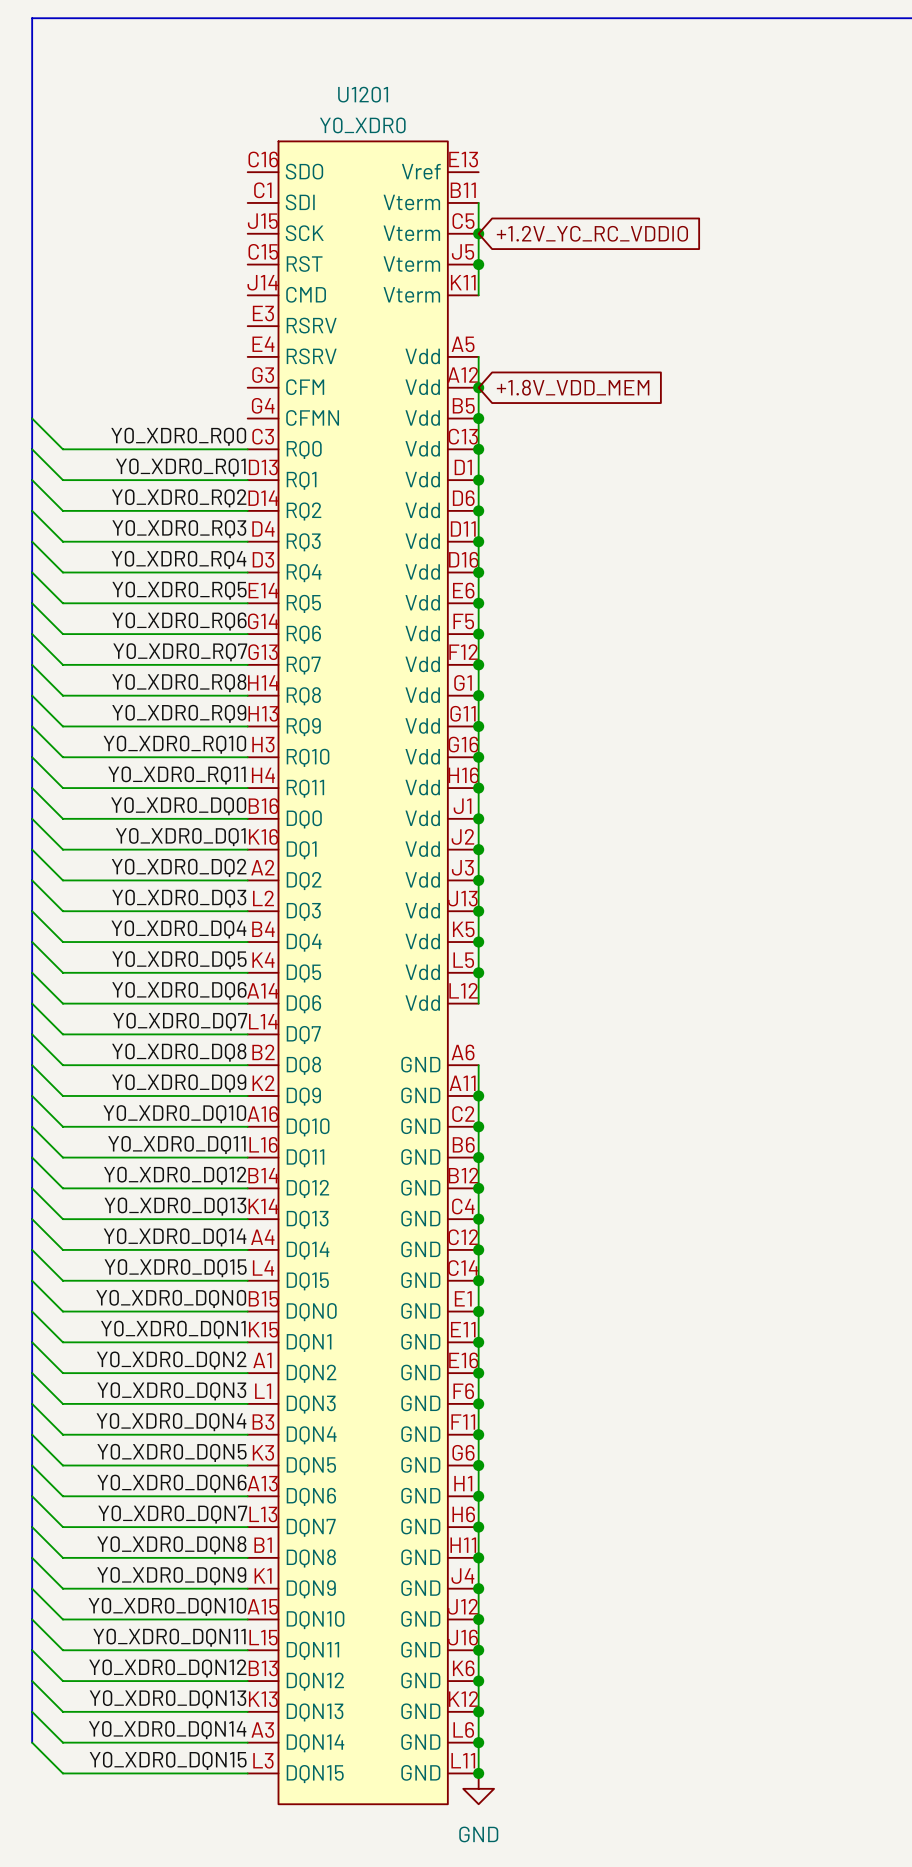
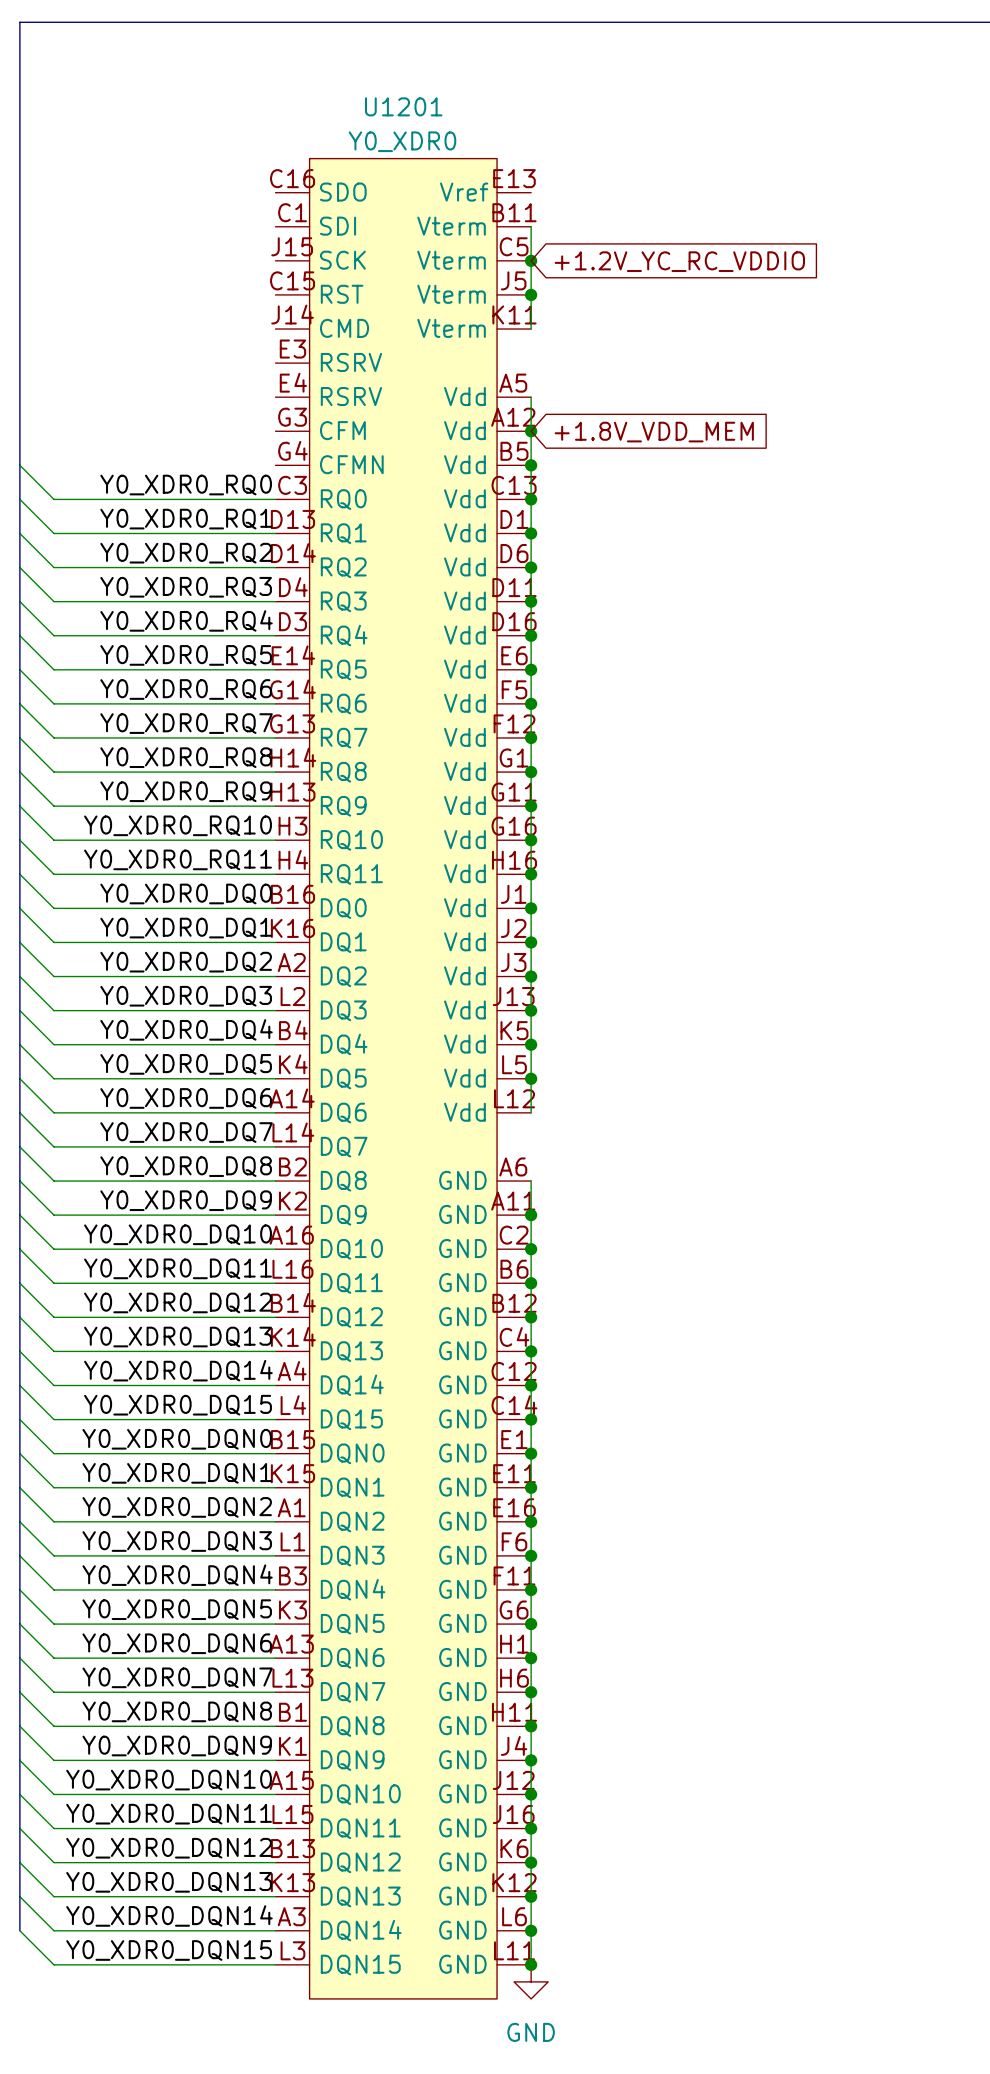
bus: (32, 18) (32, 1742) -> (36, 22) (19, 22) (19, 1930)
wire: (32, 418) (62, 449) -> (19, 465) (53, 499) (71, 499)
wire: (32, 449) (62, 480) -> (19, 499) (53, 533) (71, 533)
wire: (32, 480) (62, 510) -> (19, 533) (53, 567) (71, 567)
wire: (32, 510) (62, 541) -> (19, 567) (53, 601) (71, 601)
wire: (32, 541) (62, 572) -> (19, 601) (53, 635) (71, 635)
wire: (32, 572) (62, 603) -> (19, 635) (53, 669) (71, 669)
wire: (32, 603) (62, 634) -> (19, 669) (53, 703) (71, 703)
wire: (32, 634) (62, 664) -> (19, 703) (53, 737) (71, 737)
wire: (32, 664) (62, 695) -> (19, 737) (53, 772) (71, 772)
wire: (32, 695) (62, 726) -> (19, 772) (53, 806) (71, 806)
wire: (32, 726) (62, 757) -> (19, 806) (53, 840) (71, 840)
wire: (32, 757) (62, 788) -> (19, 840) (53, 874) (71, 874)
wire: (32, 788) (62, 818) -> (19, 874) (53, 908) (71, 908)
wire: (32, 818) (62, 849) -> (19, 908) (53, 942) (71, 942)
wire: (32, 849) (62, 880) -> (19, 942) (53, 976) (71, 976)
wire: (32, 880) (62, 911) -> (19, 976) (53, 1010) (71, 1010)
wire: (32, 911) (62, 942) -> (19, 1010) (53, 1044) (71, 1044)
wire: (32, 942) (62, 972) -> (19, 1044) (53, 1078) (71, 1078)
wire: (32, 972) (62, 1003) -> (19, 1078) (53, 1112) (71, 1112)
wire: (32, 1003) (62, 1034) -> (19, 1112) (53, 1146) (71, 1146)
wire: (32, 1034) (62, 1065) -> (19, 1146) (53, 1181) (71, 1181)
wire: (32, 1065) (62, 1095) -> (19, 1181) (53, 1215) (71, 1215)
wire: (32, 1095) (62, 1126) -> (19, 1215) (53, 1249) (71, 1249)
wire: (32, 1126) (62, 1157) -> (19, 1249) (53, 1283) (71, 1283)
wire: (32, 1157) (62, 1188) -> (19, 1283) (53, 1317) (71, 1317)
wire: (32, 1188) (62, 1219) -> (19, 1317) (53, 1351) (71, 1351)
wire: (32, 1219) (62, 1249) -> (19, 1351) (53, 1385) (71, 1385)
wire: (32, 1249) (62, 1280) -> (19, 1385) (53, 1419) (71, 1419)
wire: (32, 1280) (62, 1311) -> (19, 1419) (53, 1453) (71, 1453)
wire: (32, 1311) (62, 1342) -> (19, 1453) (53, 1487) (71, 1487)
wire: (32, 1342) (62, 1373) -> (19, 1487) (53, 1521) (71, 1521)
wire: (32, 1373) (62, 1403) -> (19, 1521) (53, 1555) (71, 1555)
wire: (32, 1403) (62, 1434) -> (19, 1555) (53, 1589) (71, 1589)
wire: (32, 1434) (62, 1465) -> (19, 1589) (53, 1624) (71, 1624)
wire: (32, 1465) (62, 1496) -> (19, 1624) (53, 1658) (71, 1658)
wire: (32, 1496) (62, 1527) -> (19, 1658) (53, 1692) (71, 1692)
wire: (32, 1527) (62, 1557) -> (19, 1692) (53, 1726) (71, 1726)
wire: (32, 1557) (62, 1588) -> (19, 1726) (53, 1760) (71, 1760)
wire: (32, 1588) (62, 1619) -> (19, 1760) (53, 1794) (71, 1794)
wire: (32, 1619) (62, 1650) -> (19, 1794) (53, 1828) (71, 1828)
wire: (32, 1650) (62, 1681) -> (19, 1828) (53, 1862) (71, 1862)
wire: (32, 1681) (62, 1711) -> (19, 1862) (53, 1896) (71, 1896)
wire: (32, 1711) (62, 1742) -> (19, 1896) (53, 1930) (71, 1930)
wire: (32, 1742) (62, 1773) -> (19, 1930) (53, 1964) (71, 1964)

